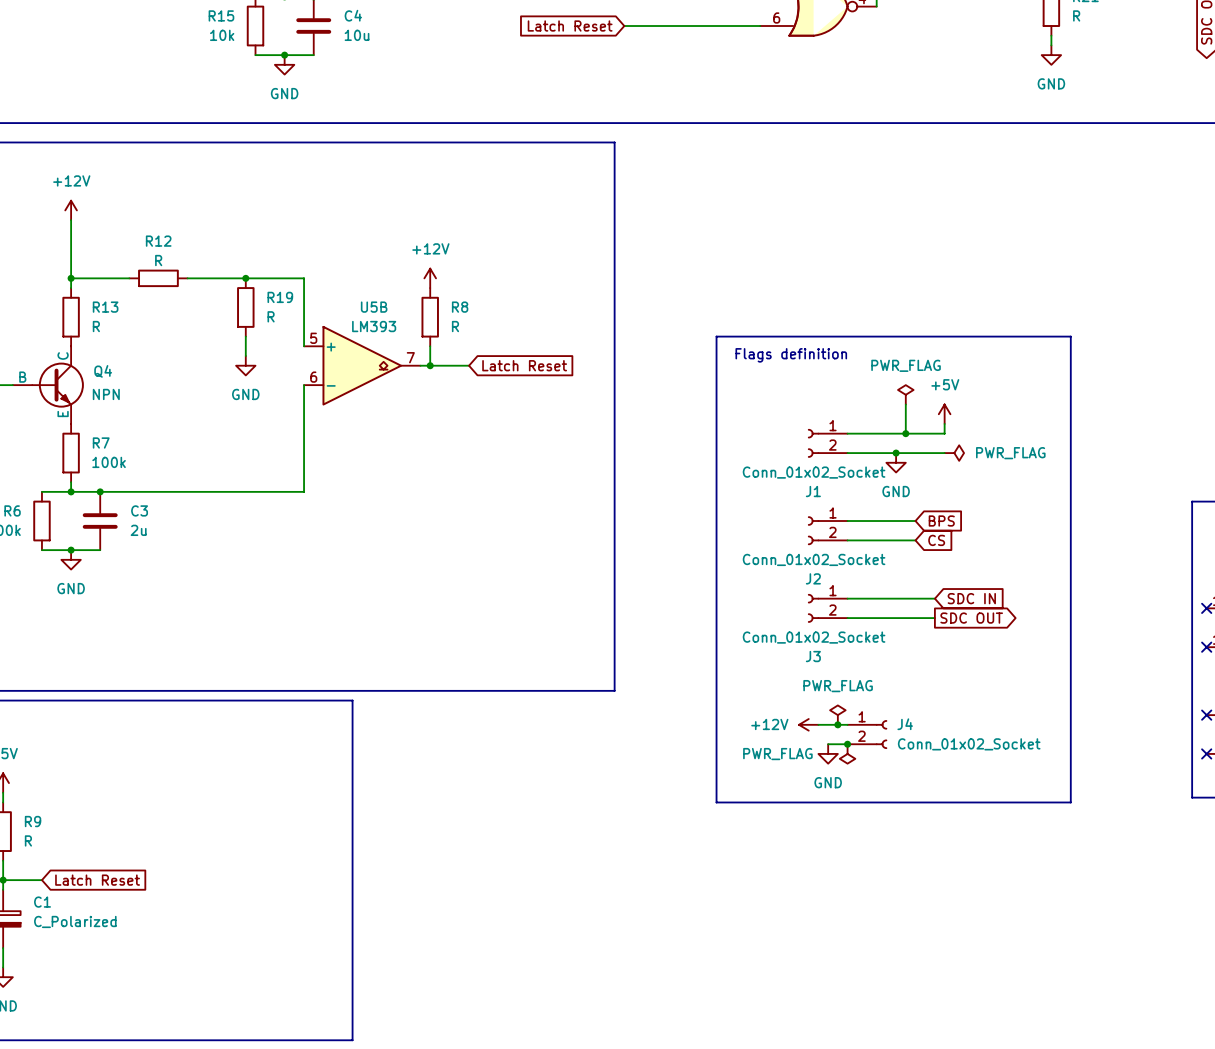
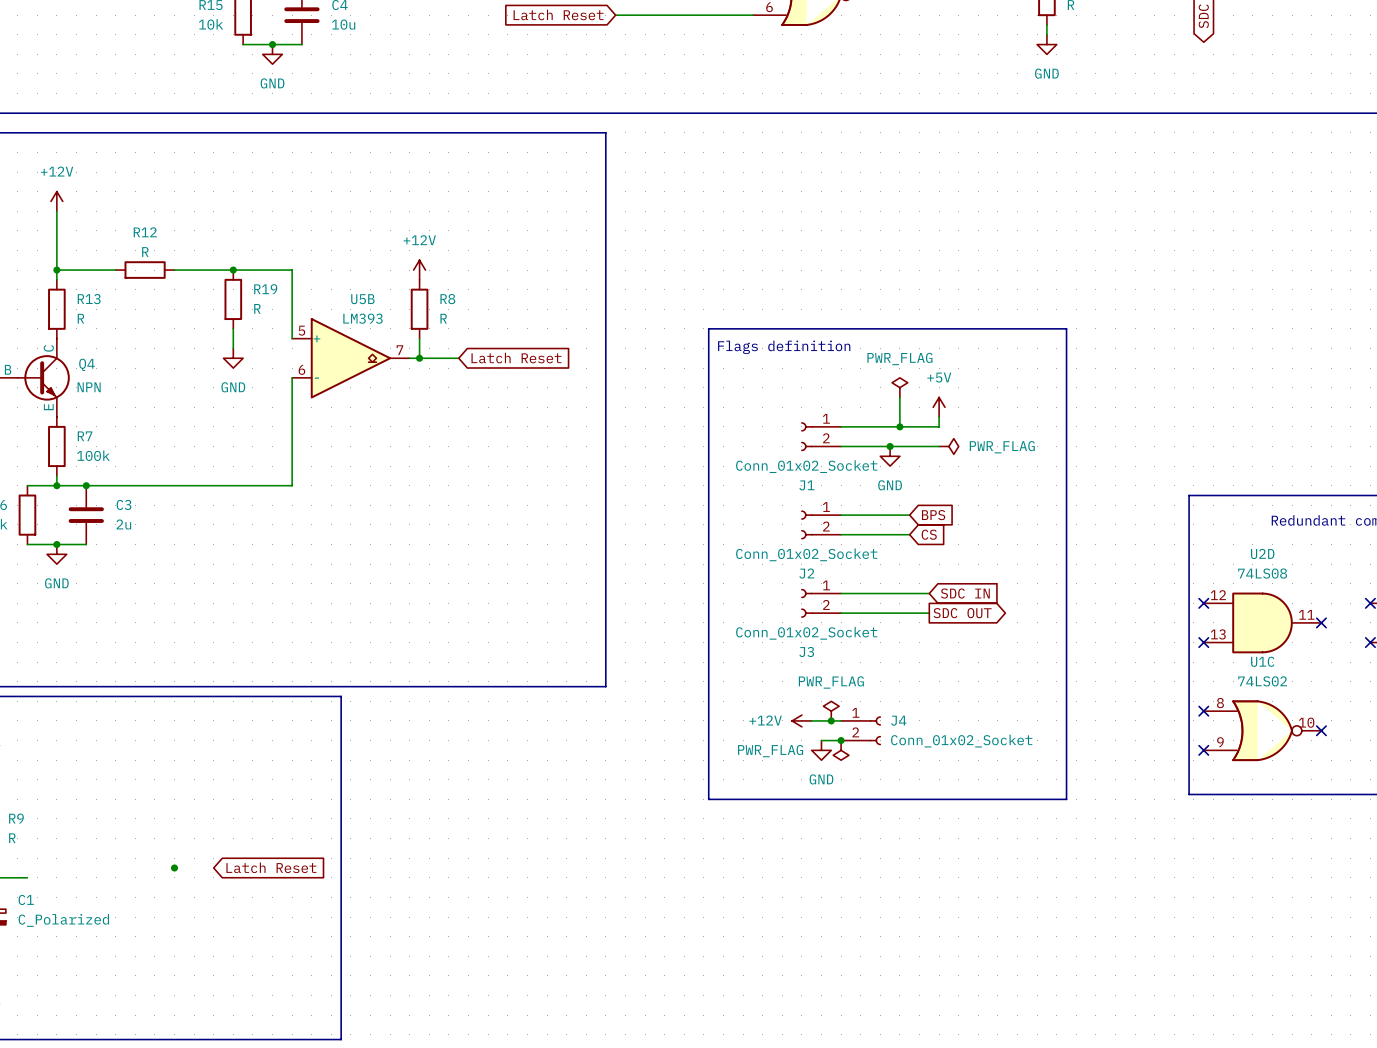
junction: none -> (174, 868)
global label position: Latch Reset (97, 880) -> Latch Reset (271, 867)

